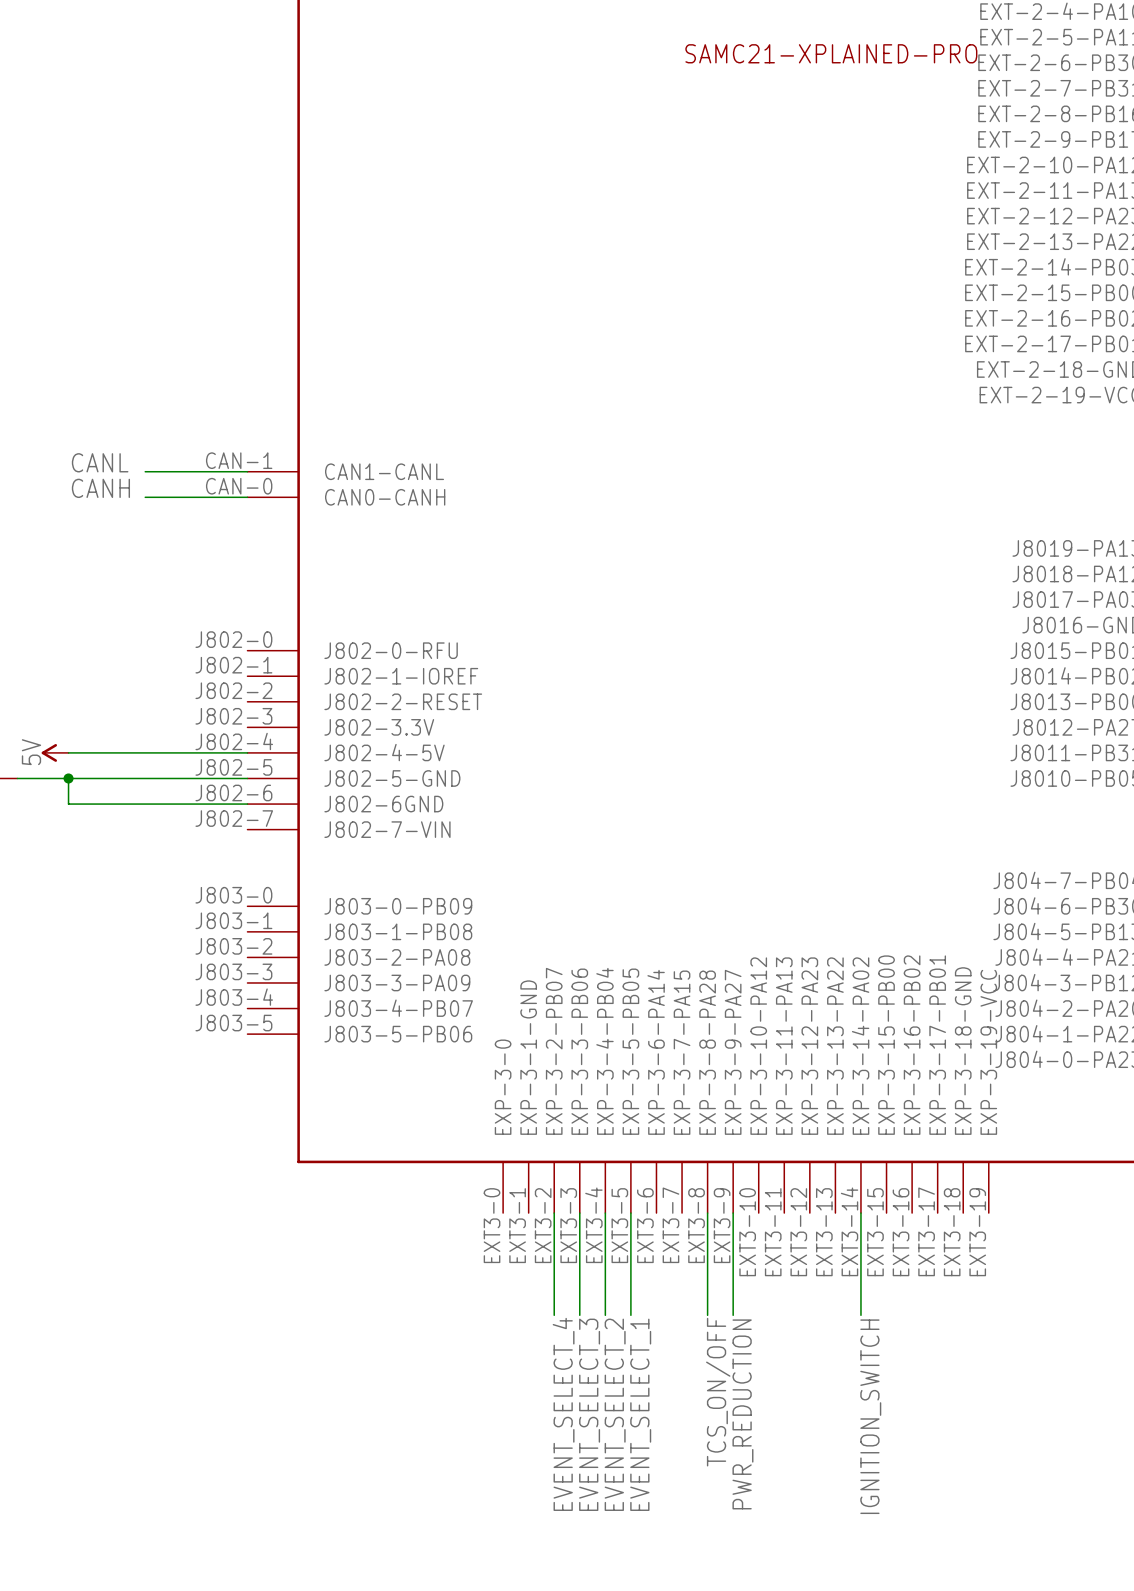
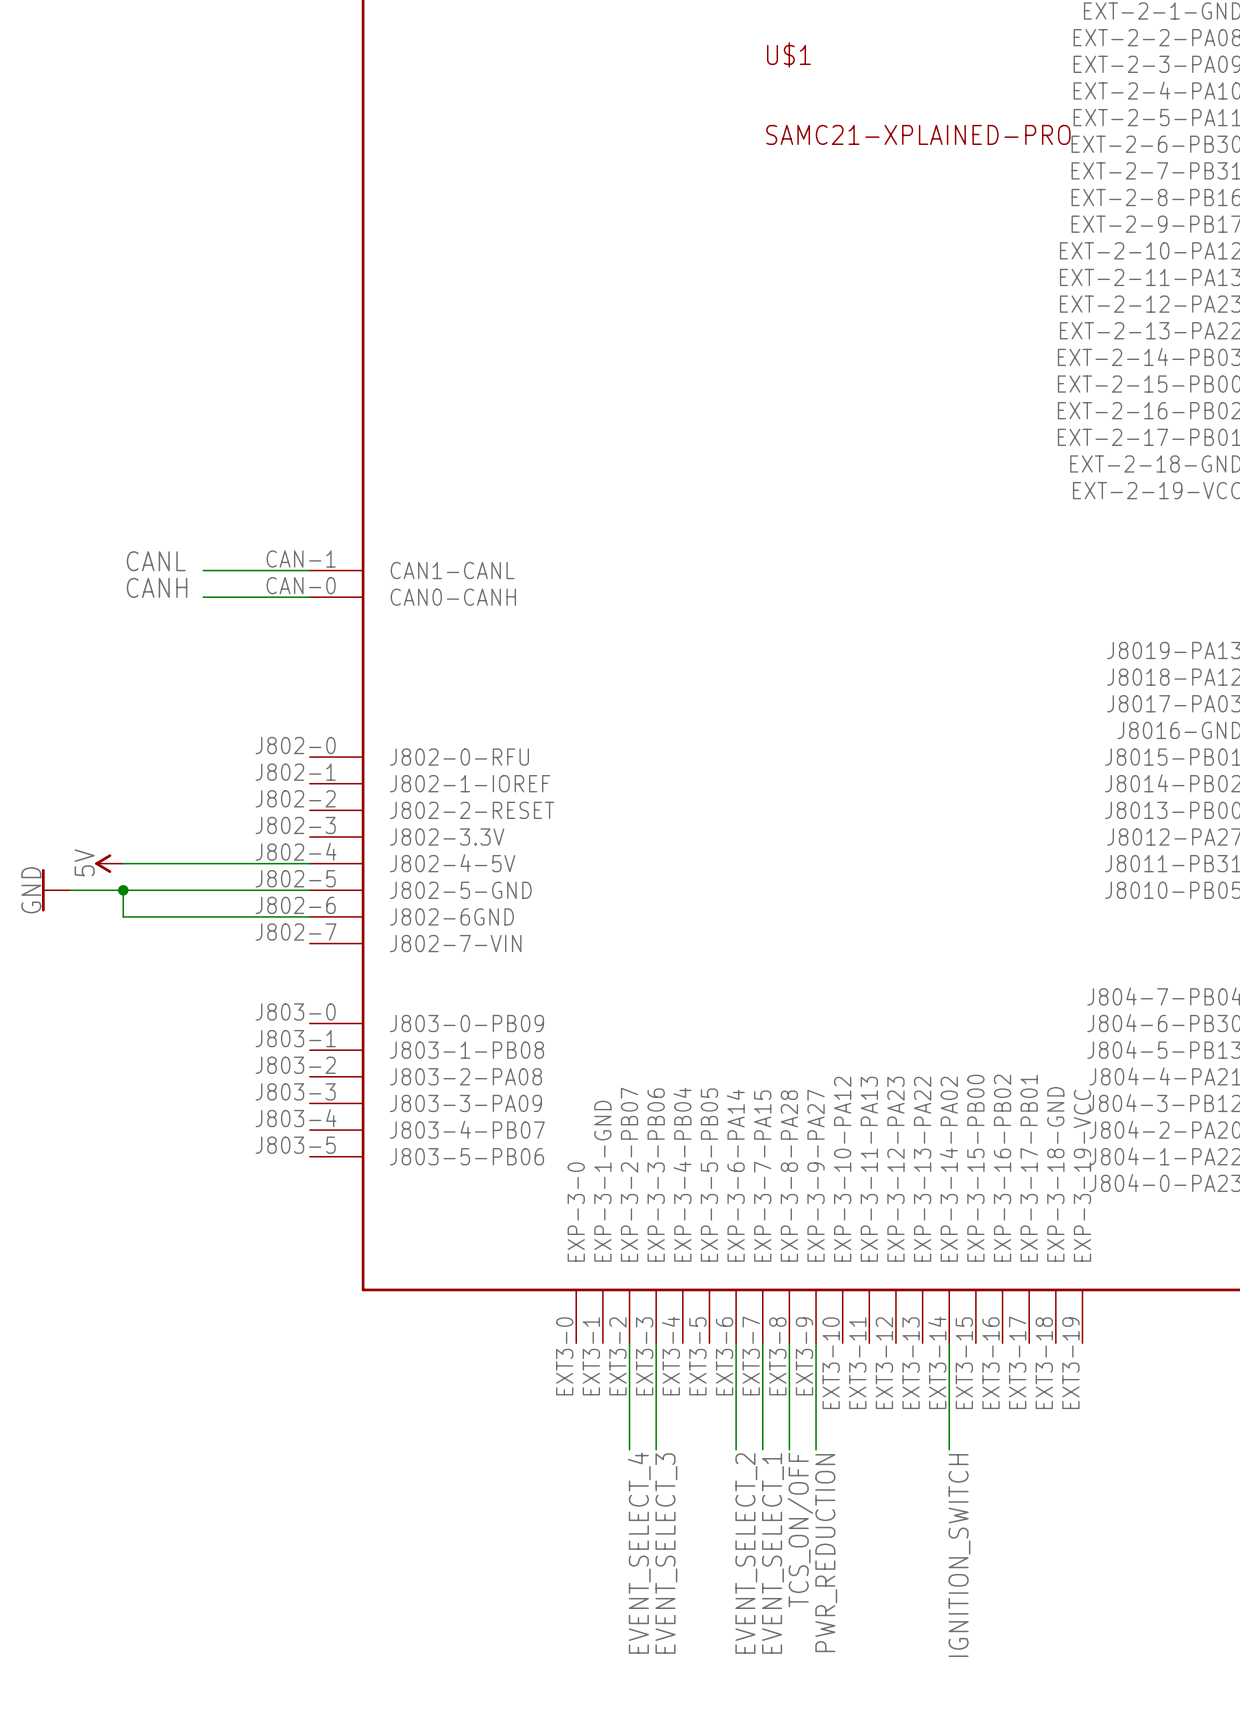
wire: (605, 1213) (605, 1315) -> (736, 1343) (736, 1449)
wire: (630, 1213) (630, 1315) -> (762, 1343) (762, 1449)
label position: EVENT_SELECT_2 (615, 1414) -> EVENT_SELECT_2 (746, 1553)
label position: EVENT_SELECT_1 (640, 1414) -> EVENT_SELECT_1 (772, 1553)

